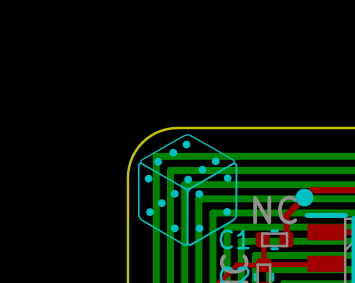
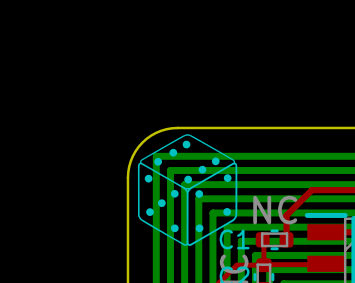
drawing: [295, 188, 314, 207] -> none

